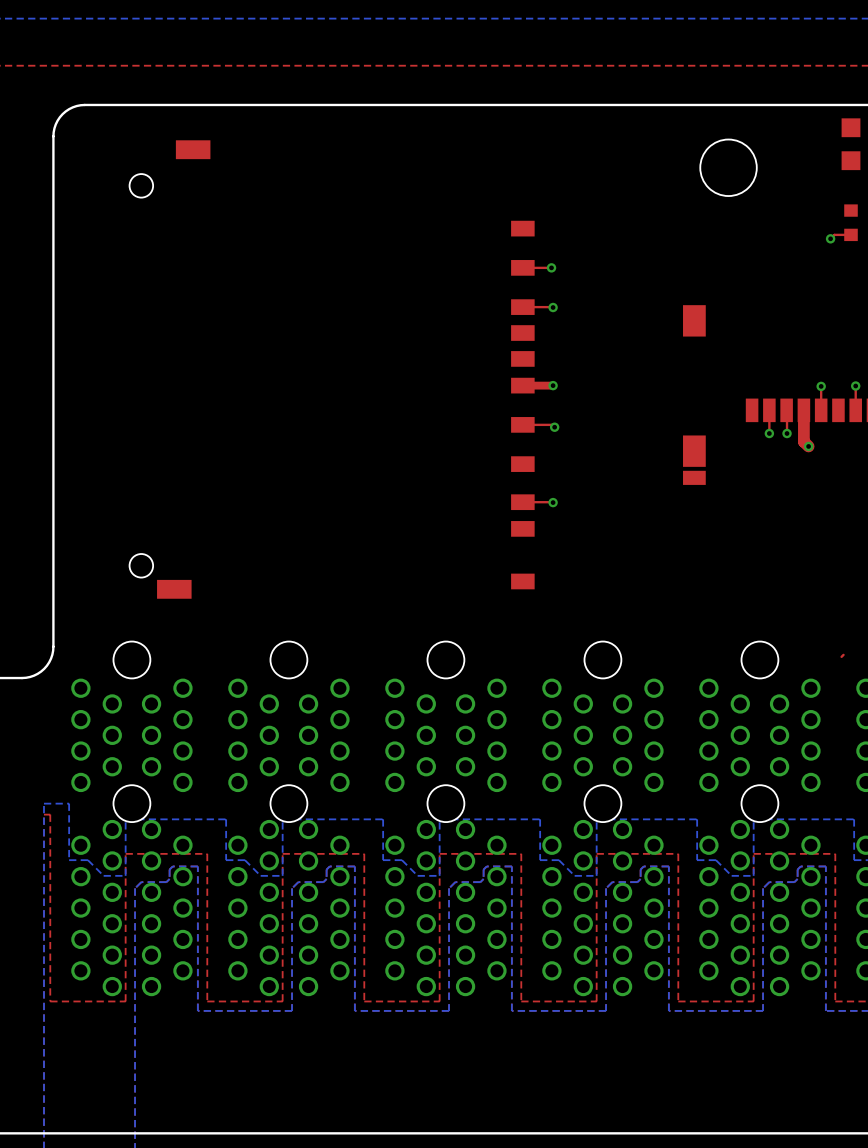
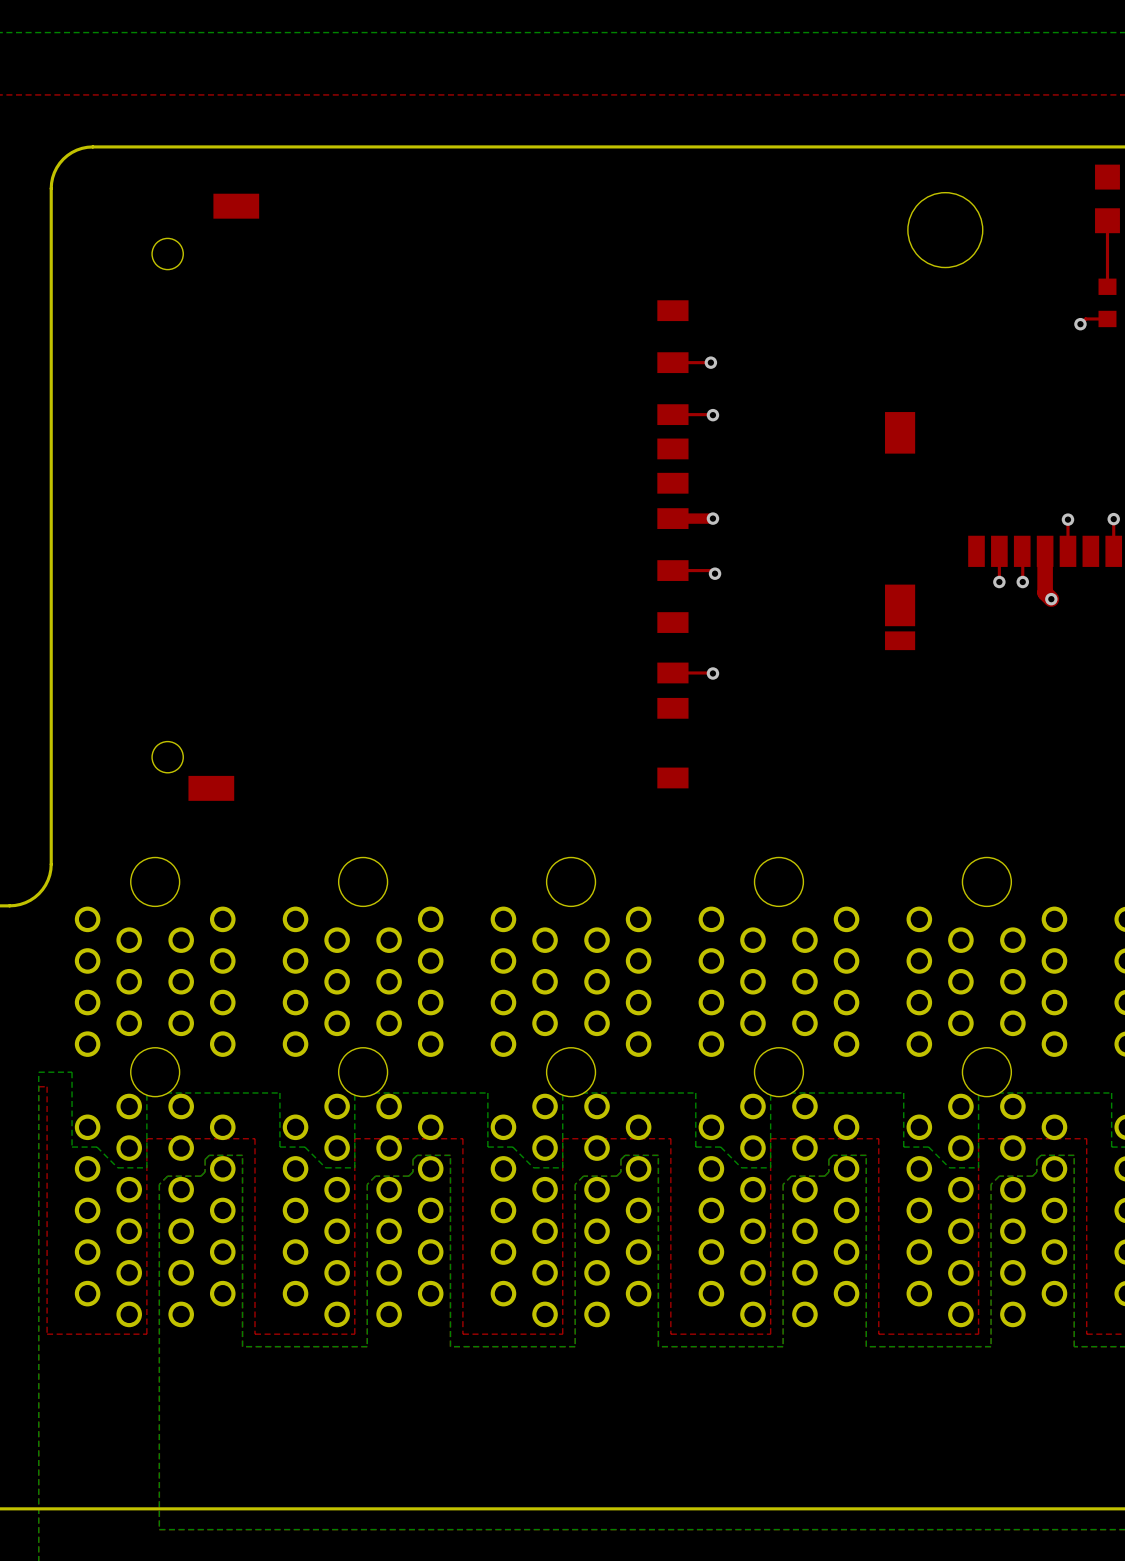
top track: none -> (1107, 220) (1107, 286)
top track: (843, 654) (841, 656) -> none

